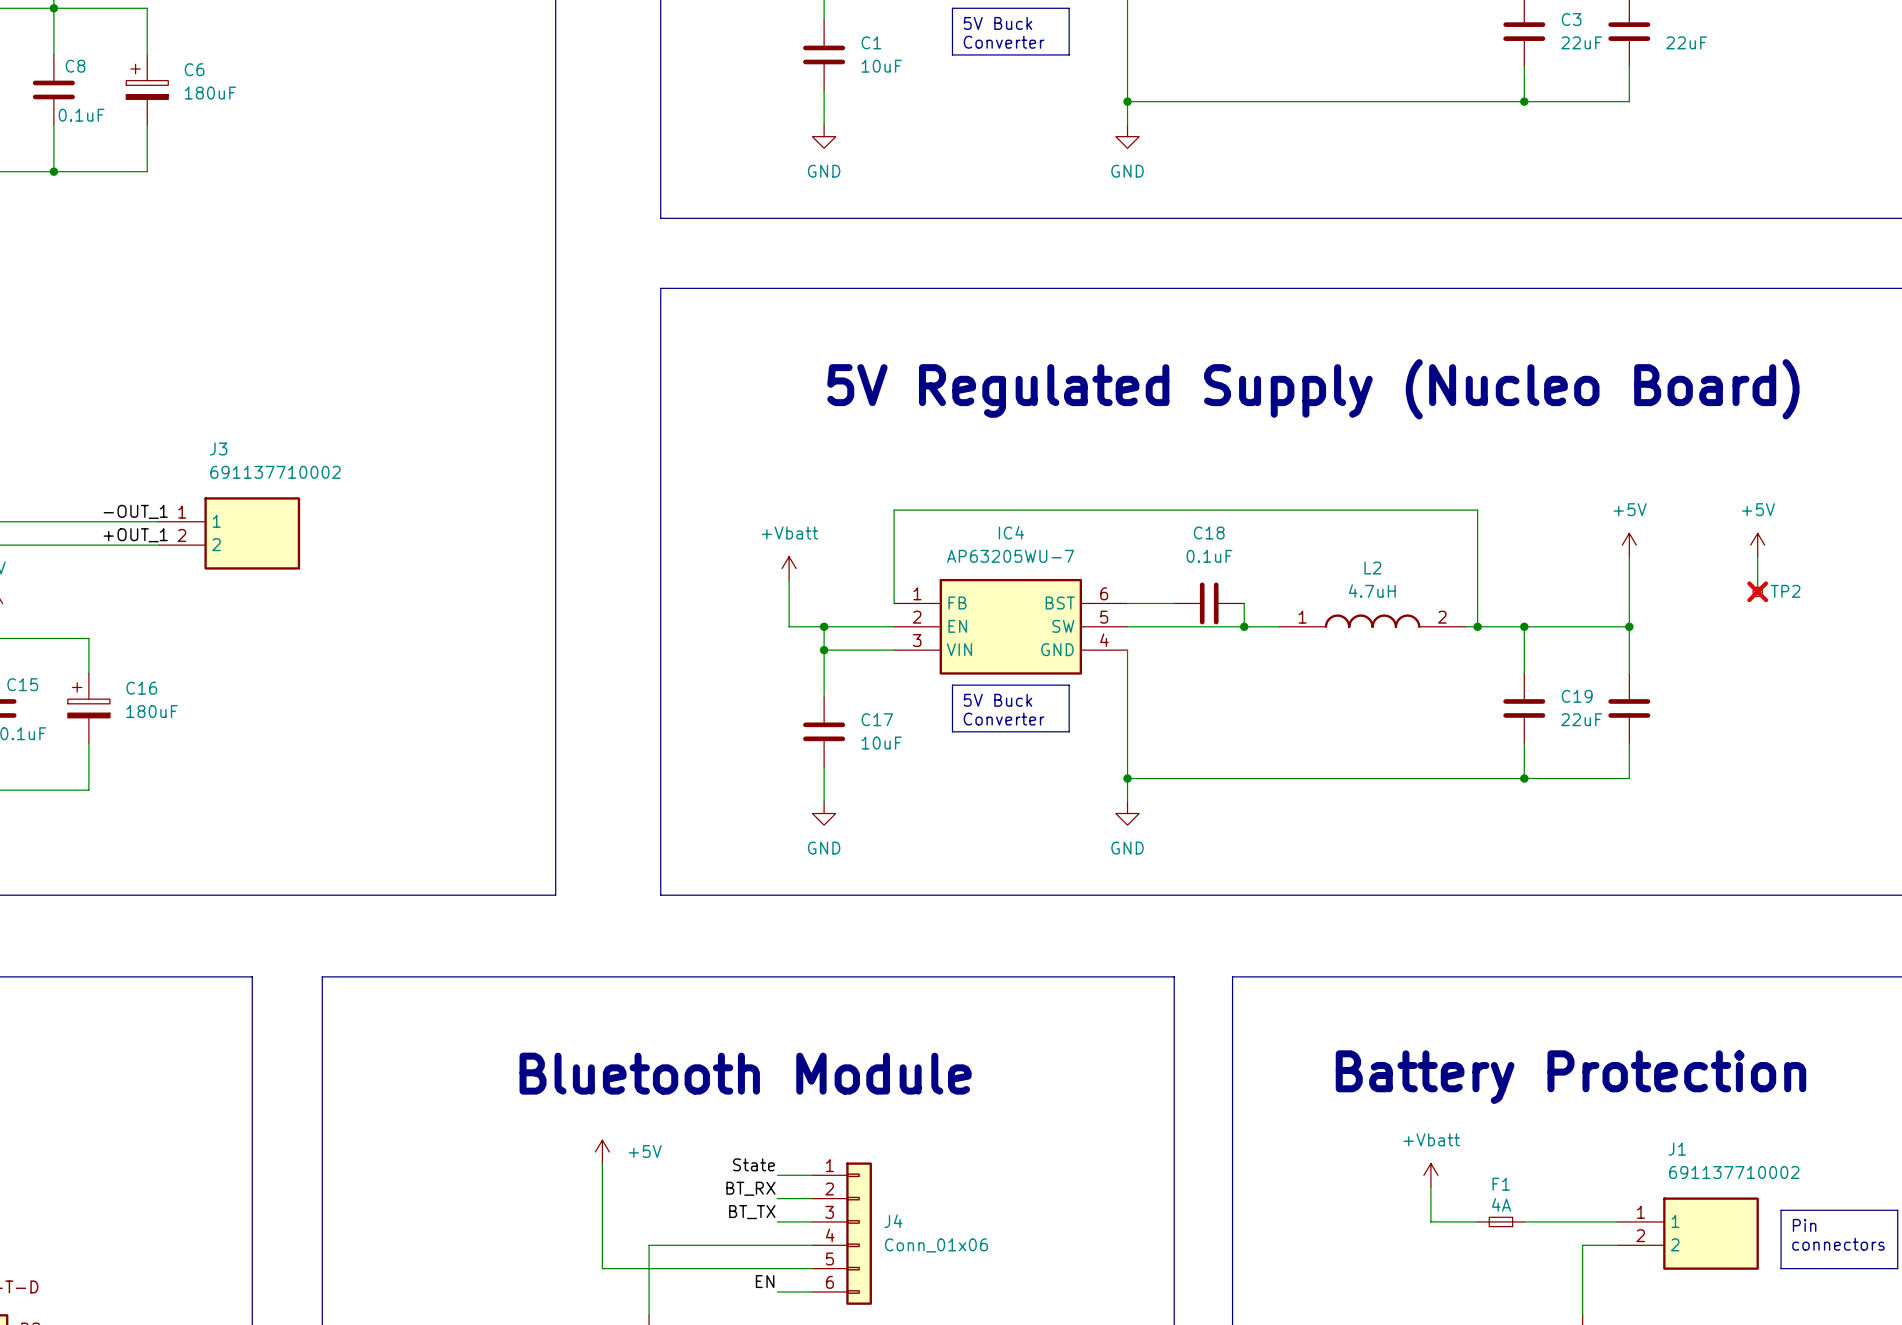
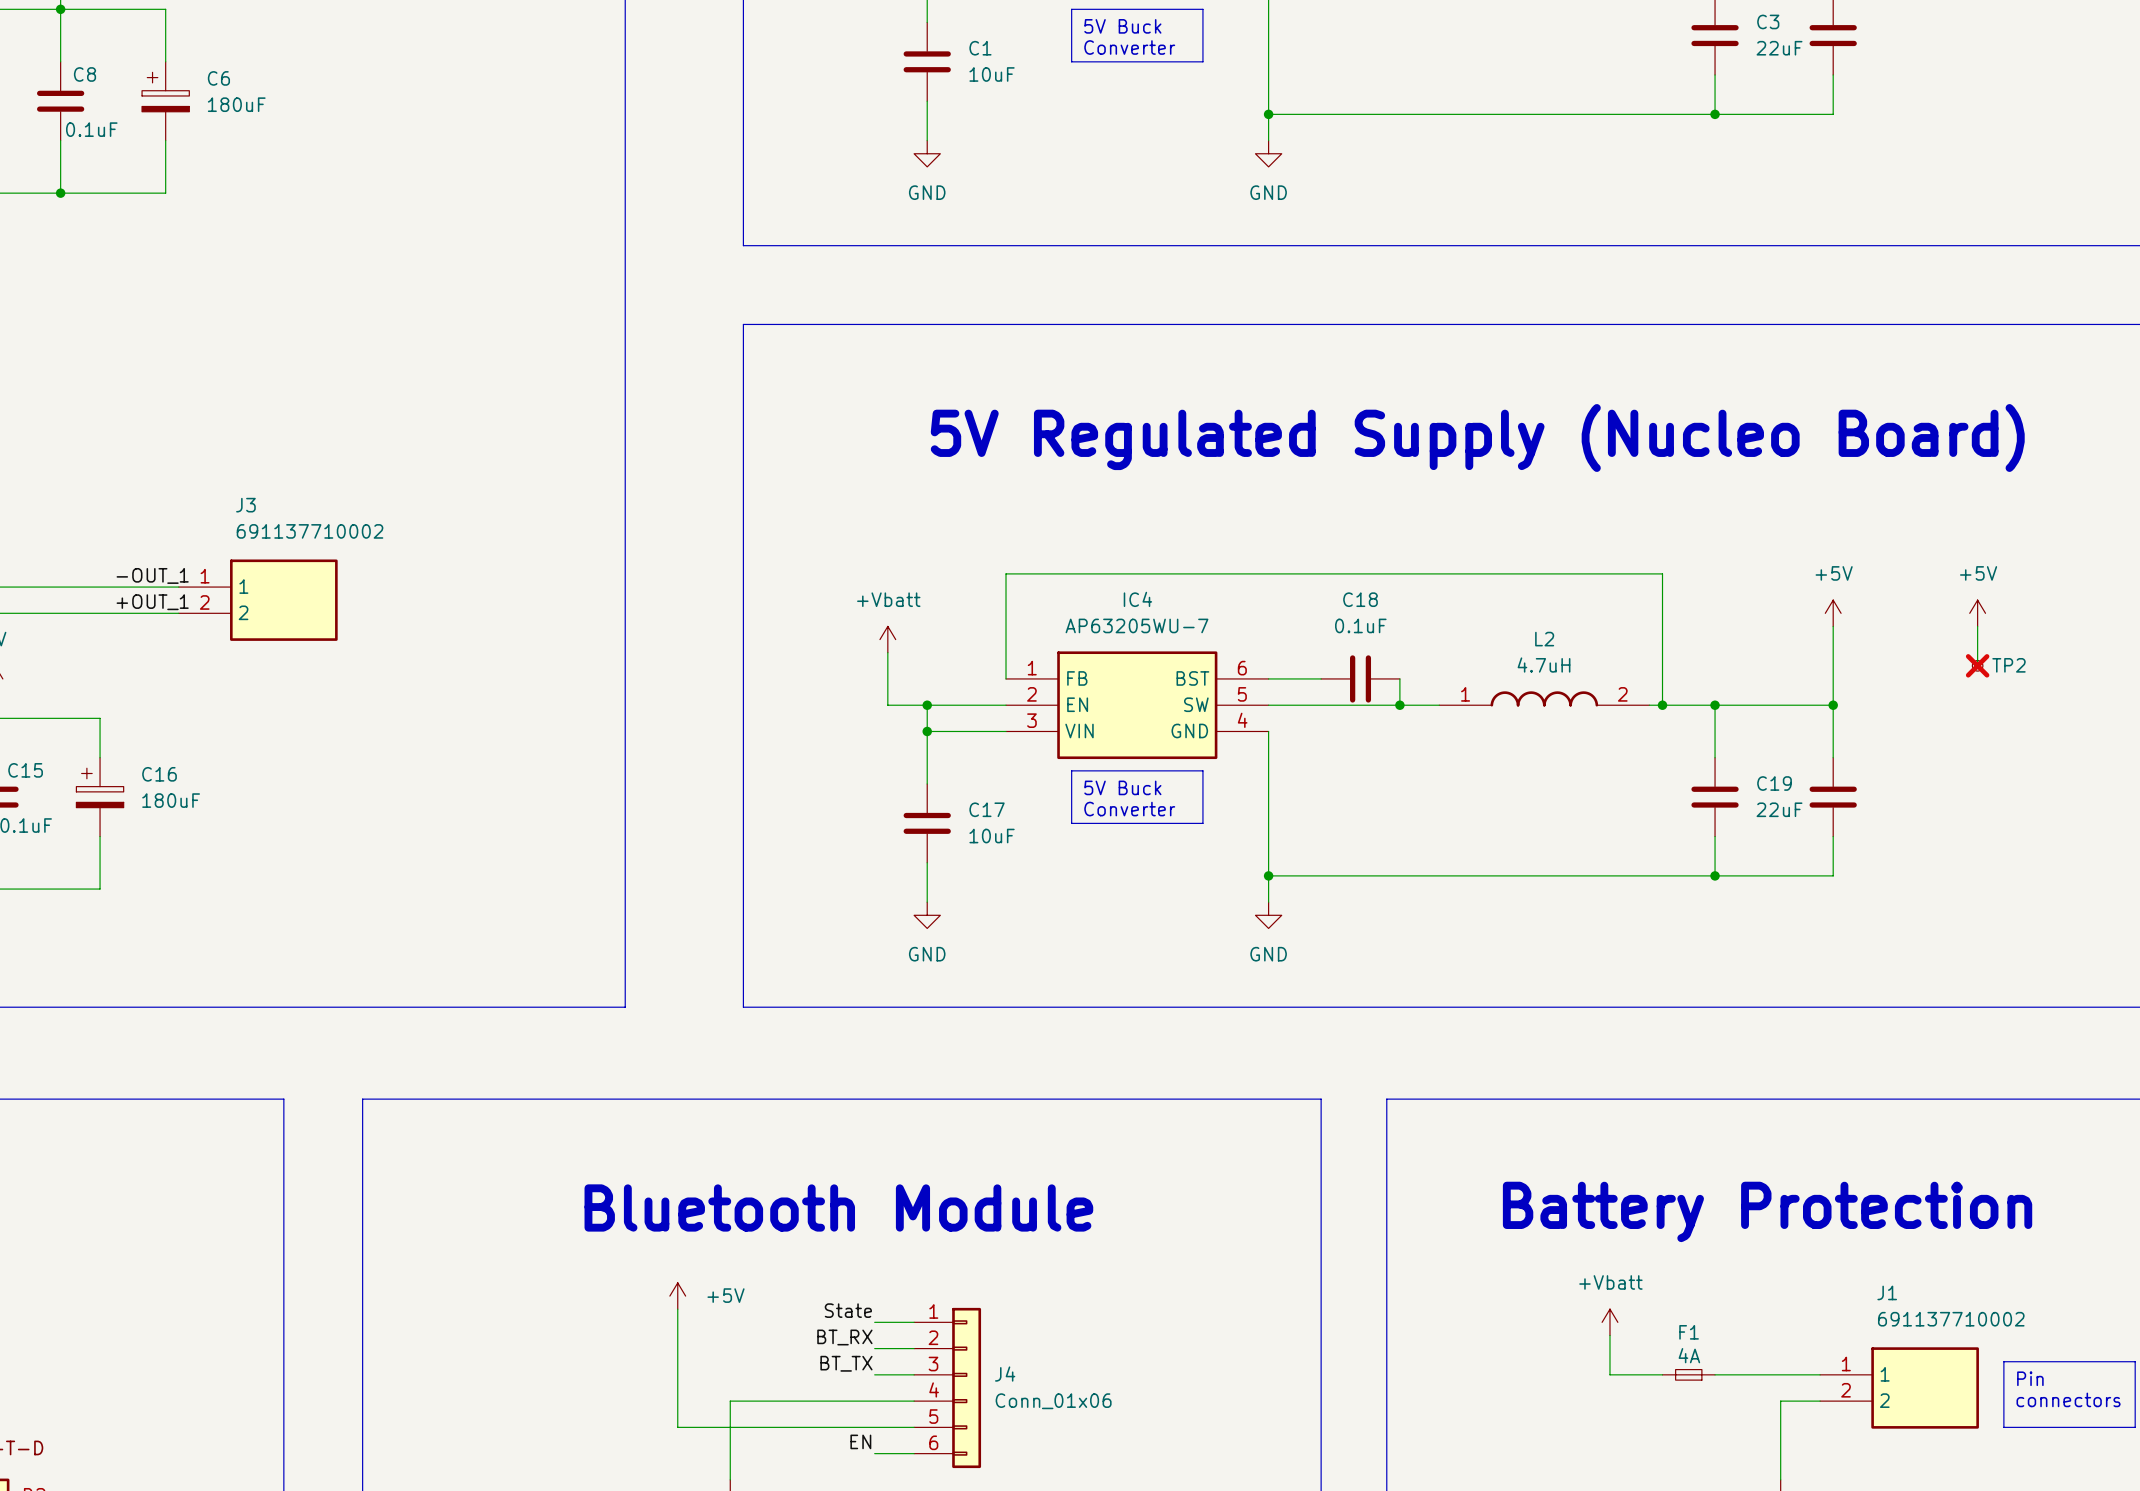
part value: 22uF (1686, 42) -> none

